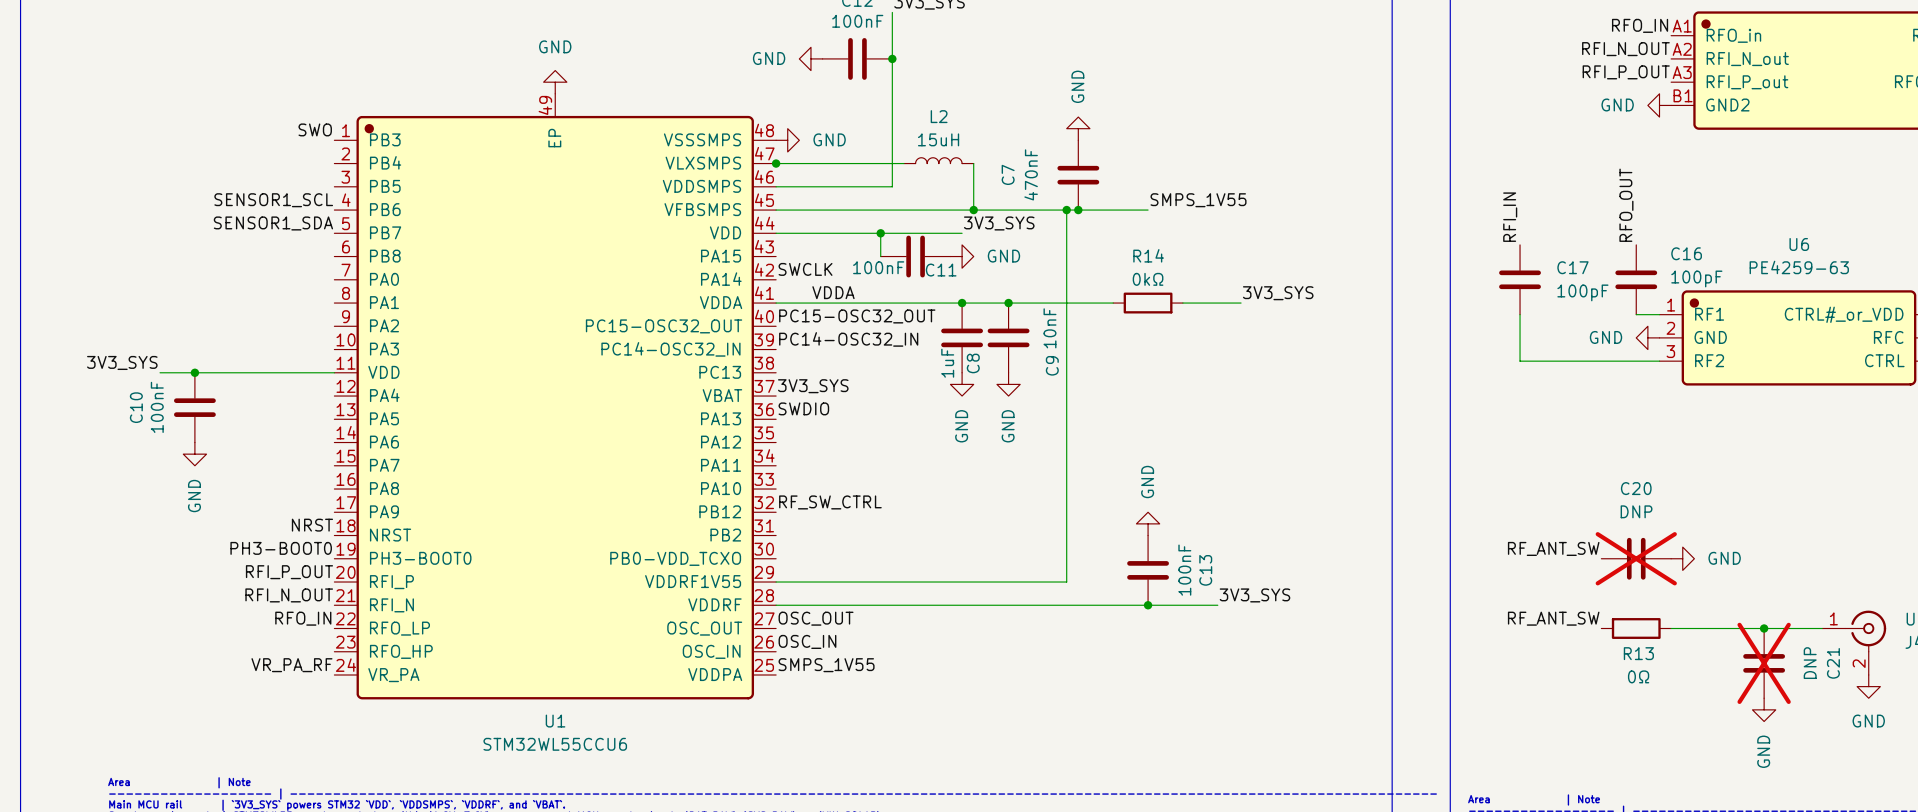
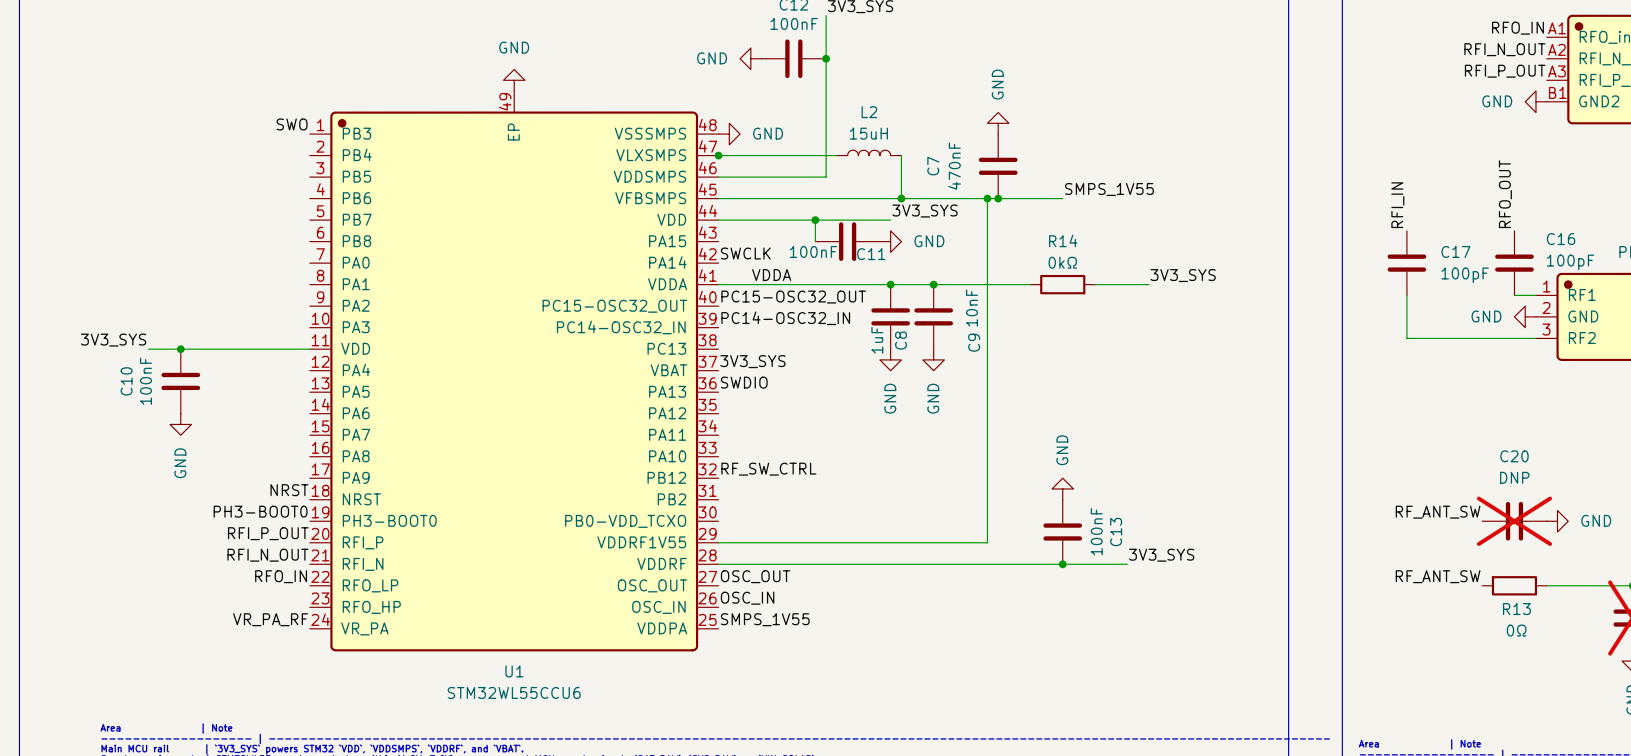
label: SENSOR1_SCL (273, 200) -> none
label: SENSOR1_SDA (273, 223) -> none

